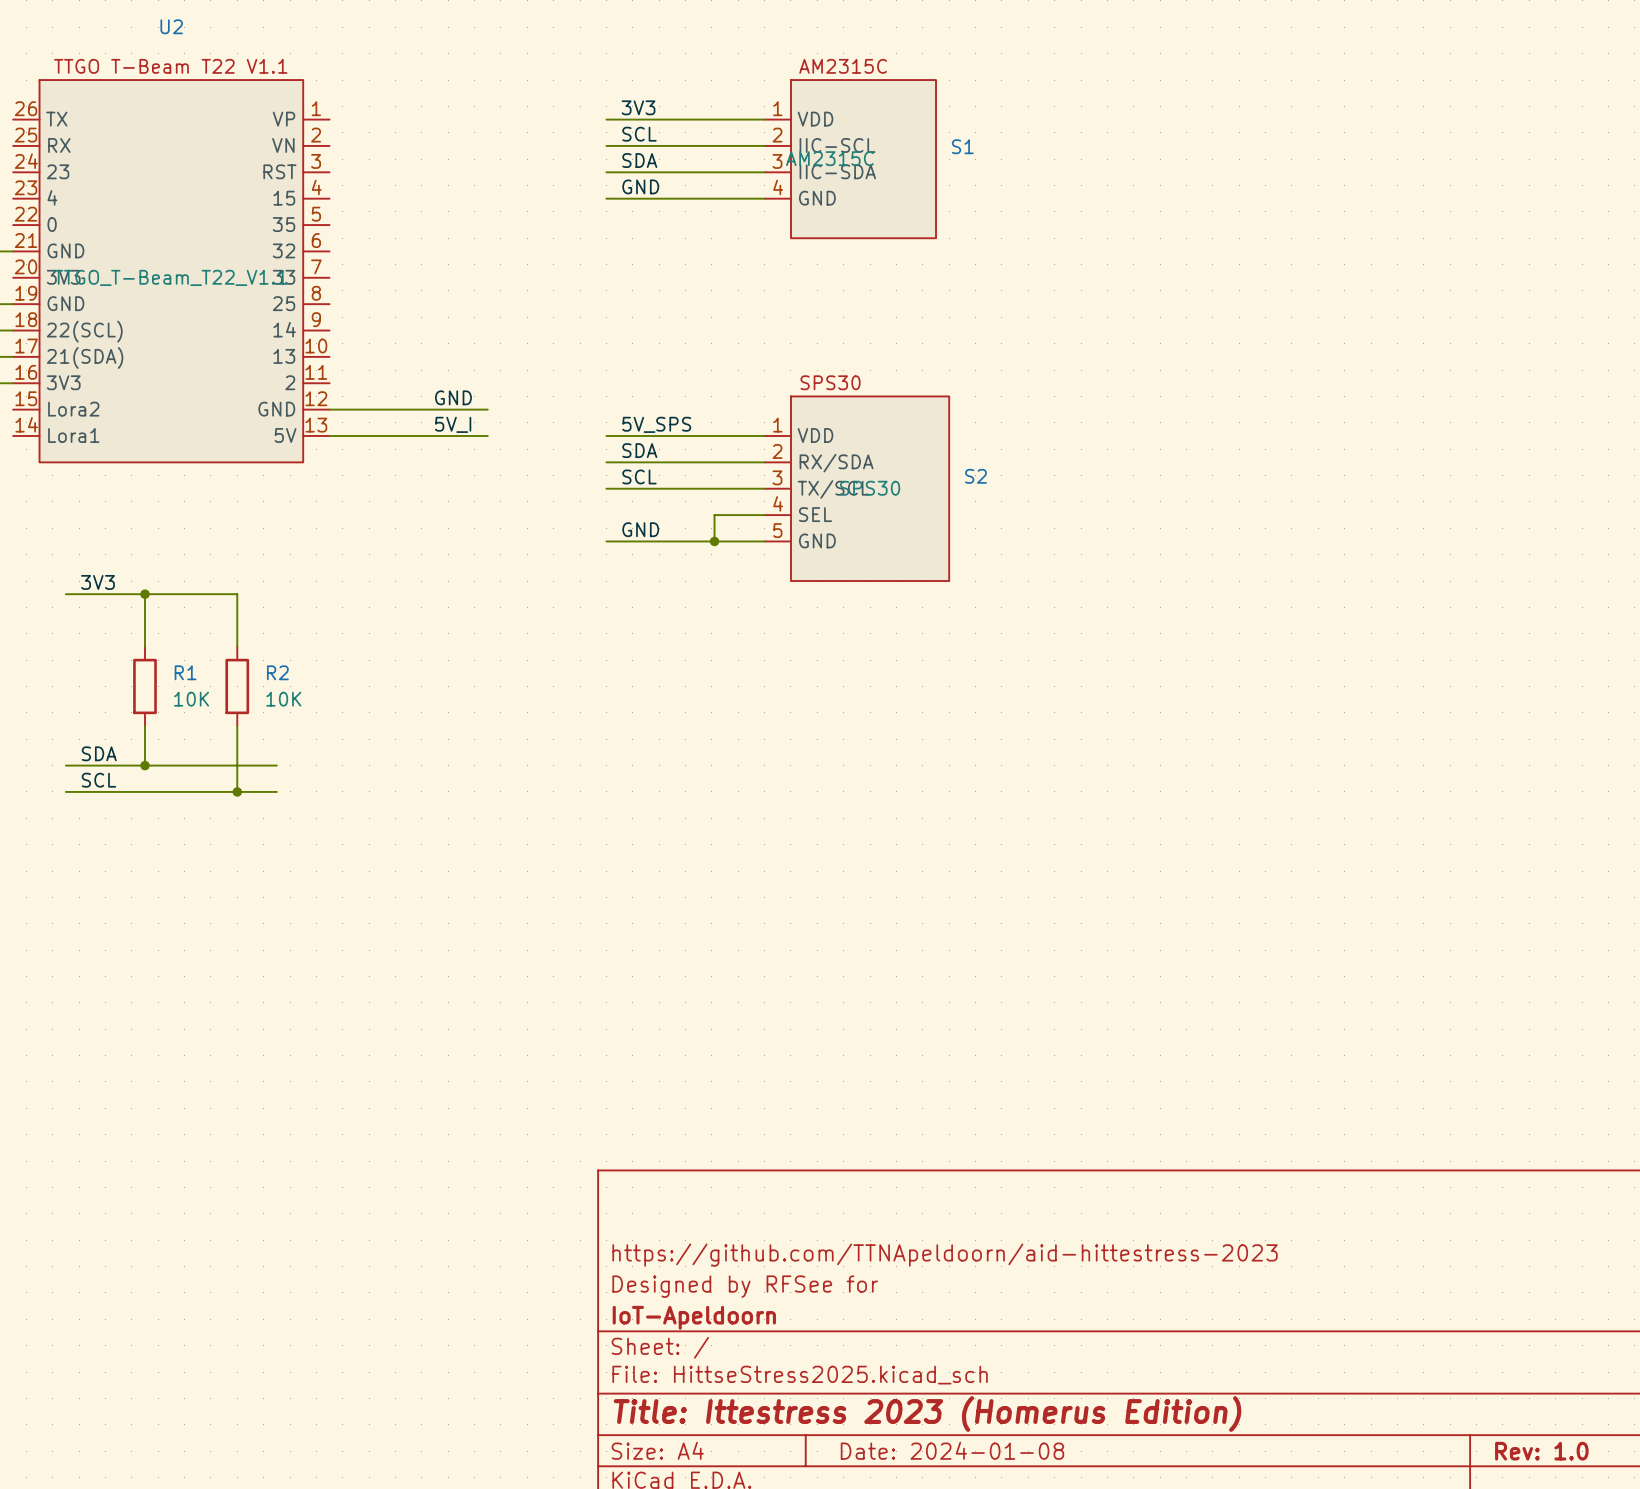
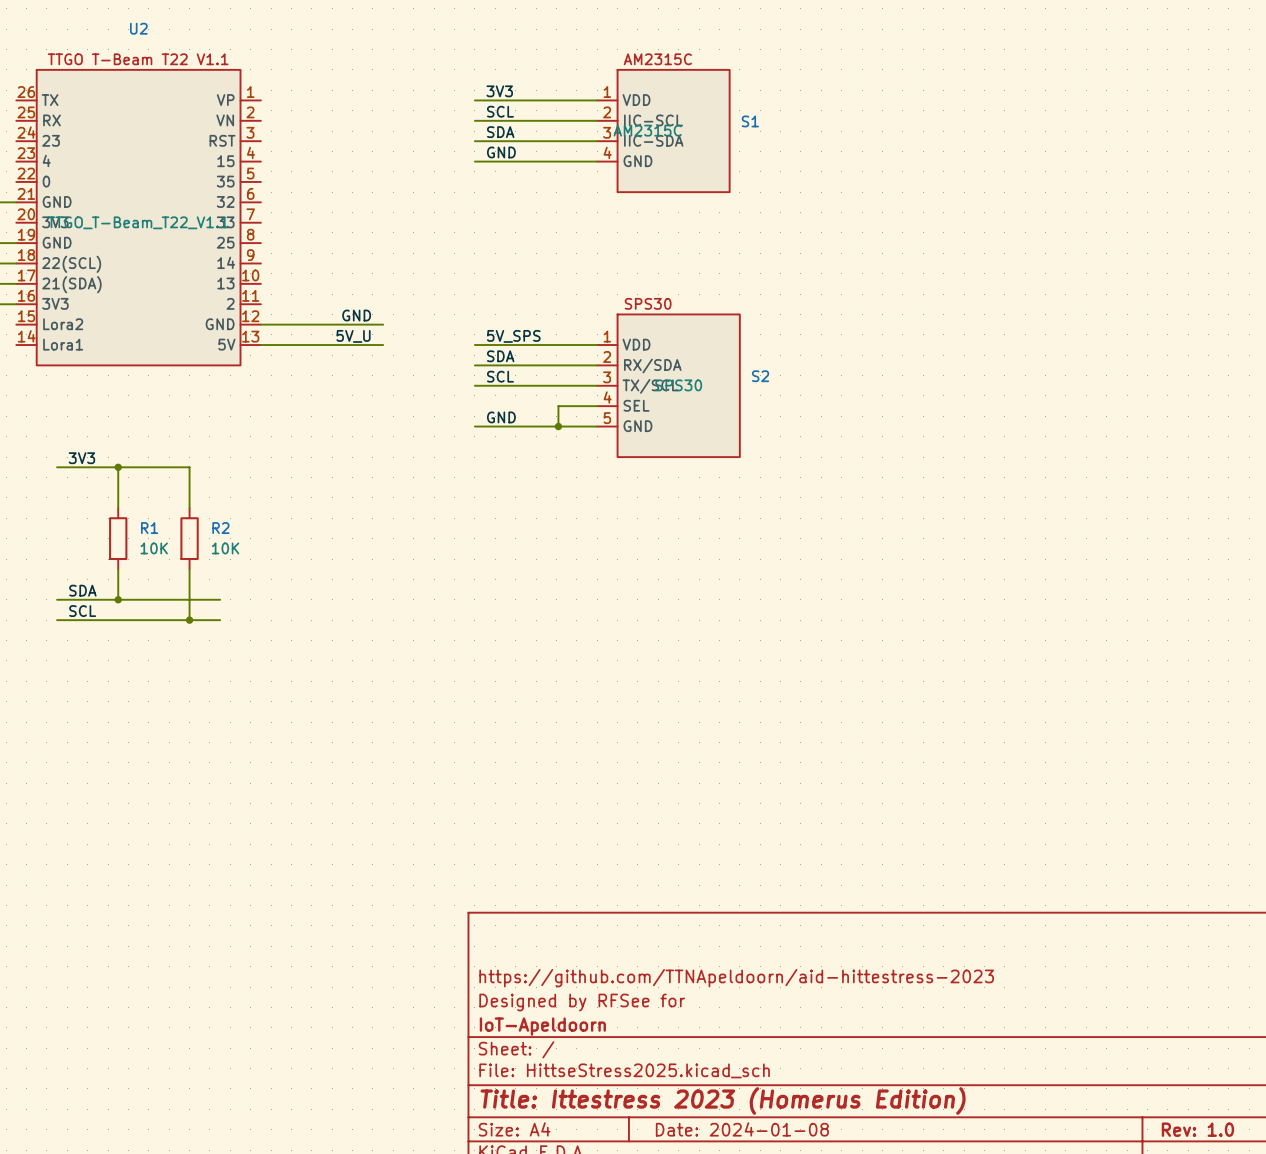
label: 5V_I (453, 424) -> 5V_U (353, 336)

